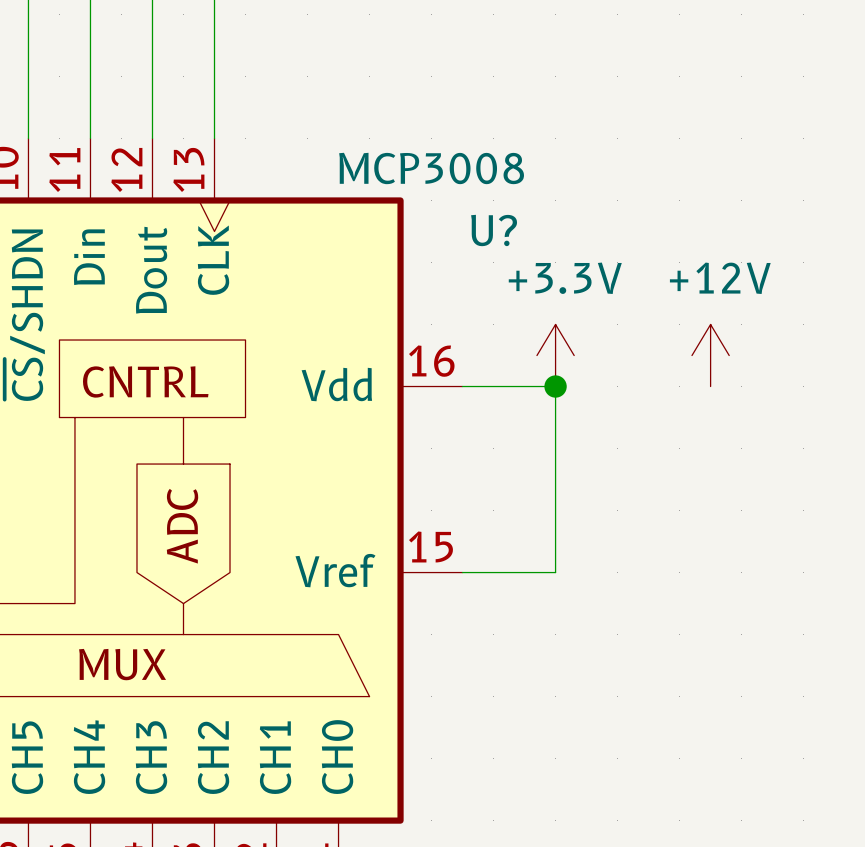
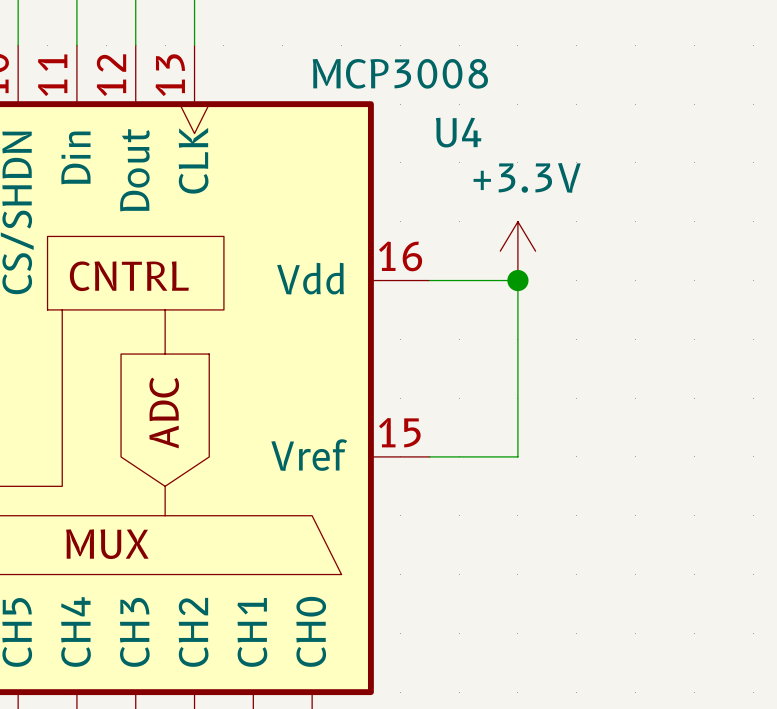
U? name: U? (494, 230) -> U4 (458, 132)
power symbol: +12V (710, 355) -> none

